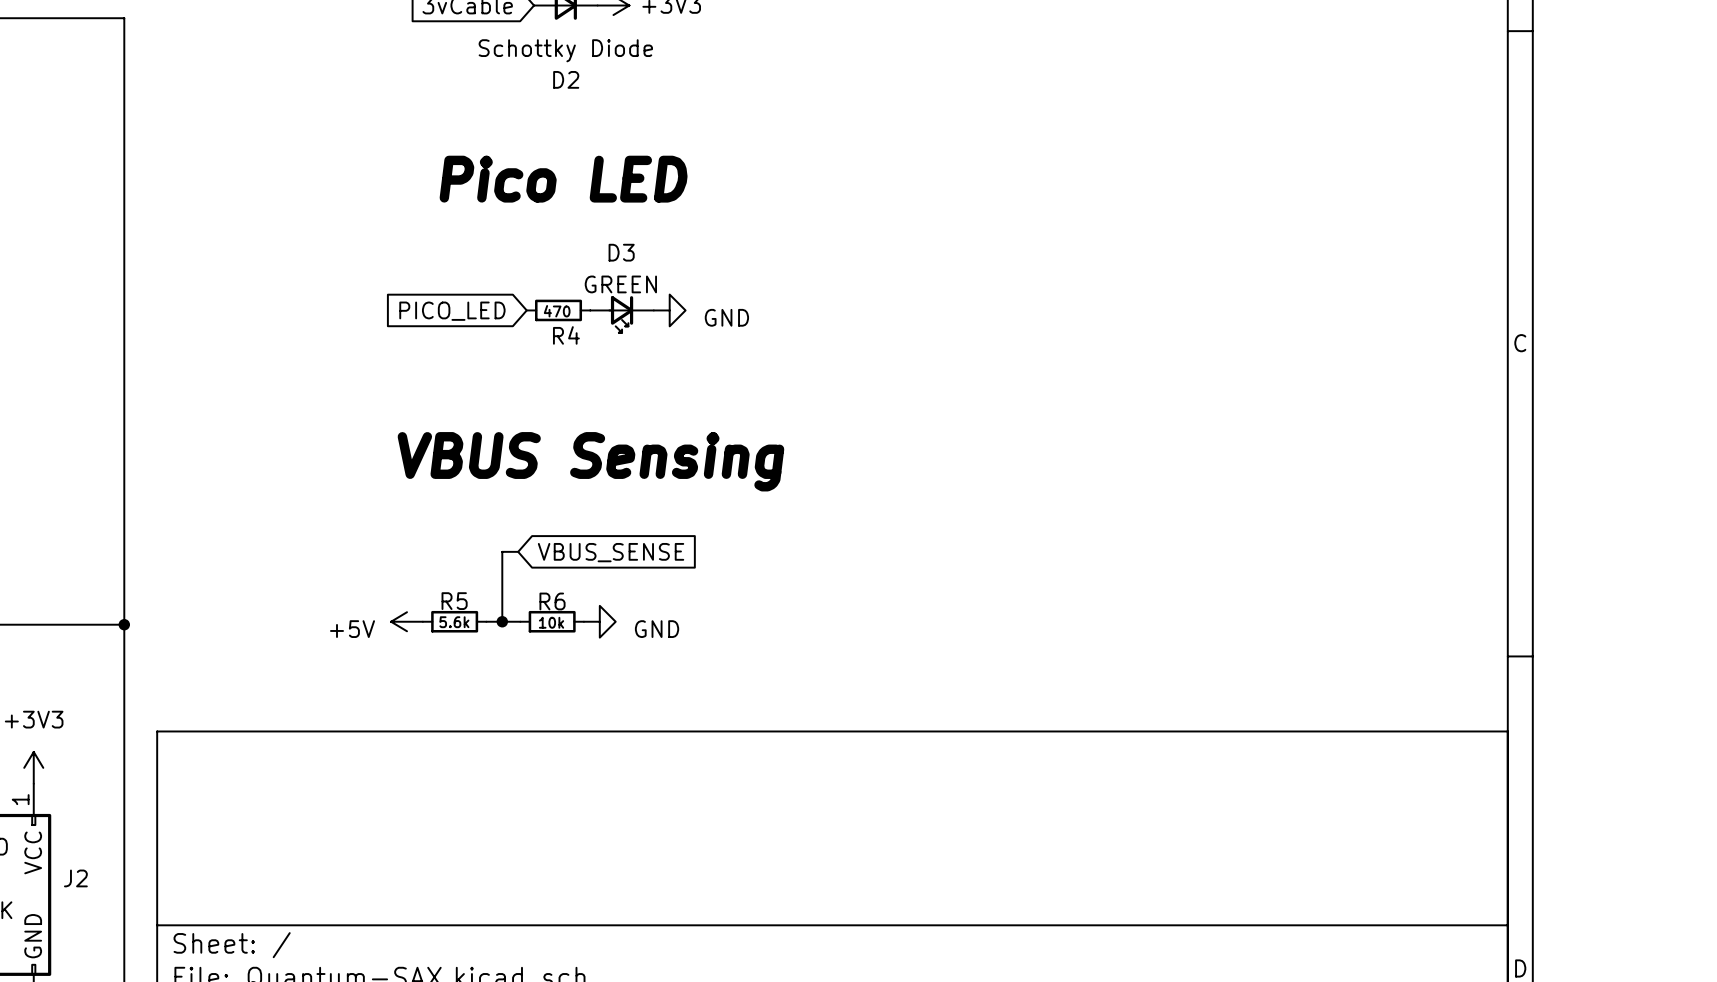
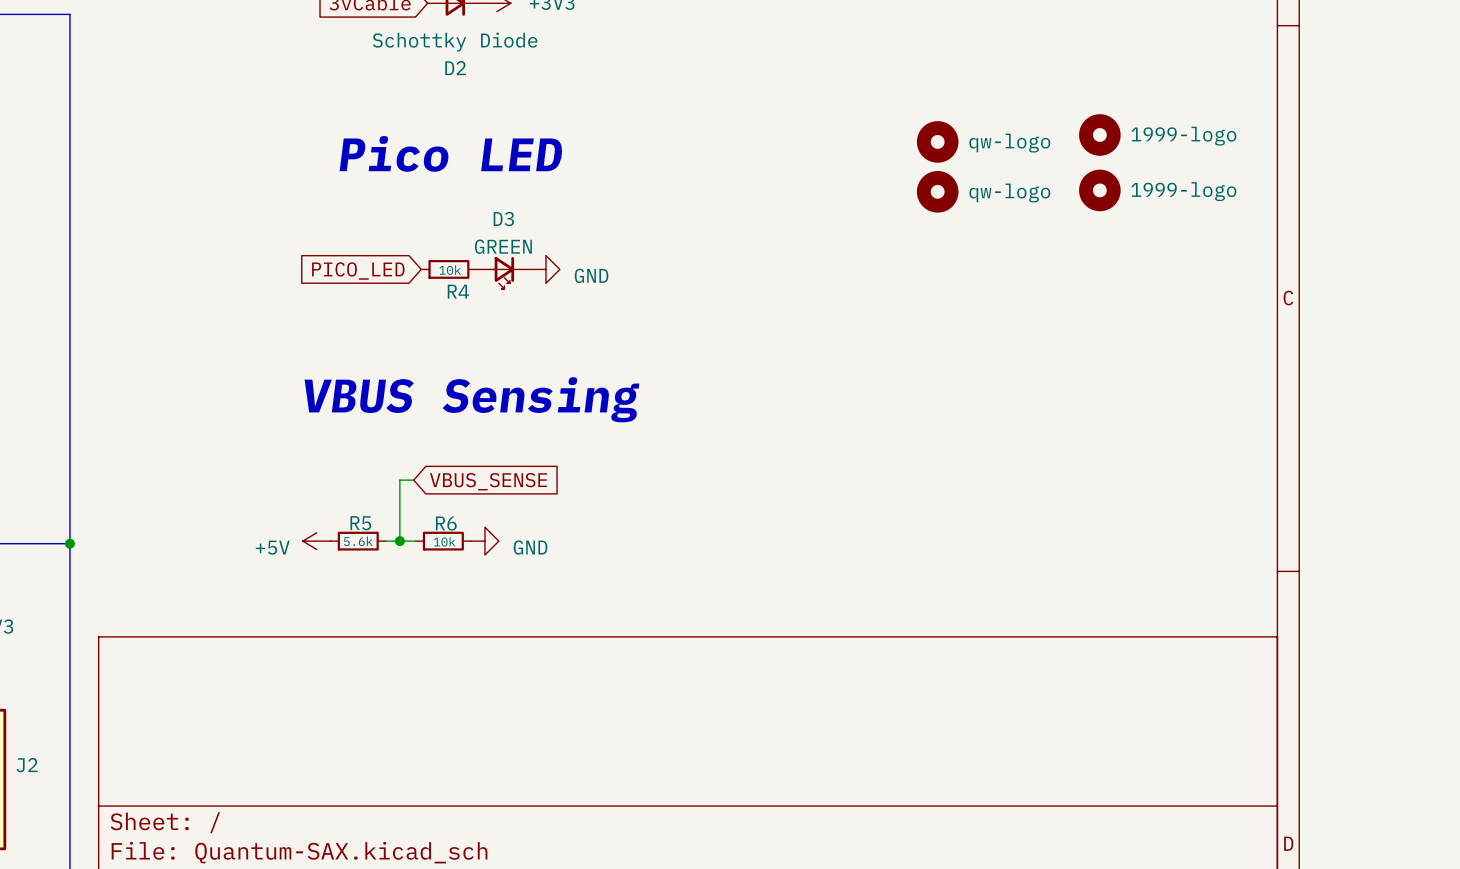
part: none -> 1999-logo (1099, 134)
part: none -> qw-logo (937, 141)
part: none -> 1999-logo (1099, 190)
part: none -> qw-logo (937, 191)
R4 value: 470 (557, 311) -> 10k (450, 270)

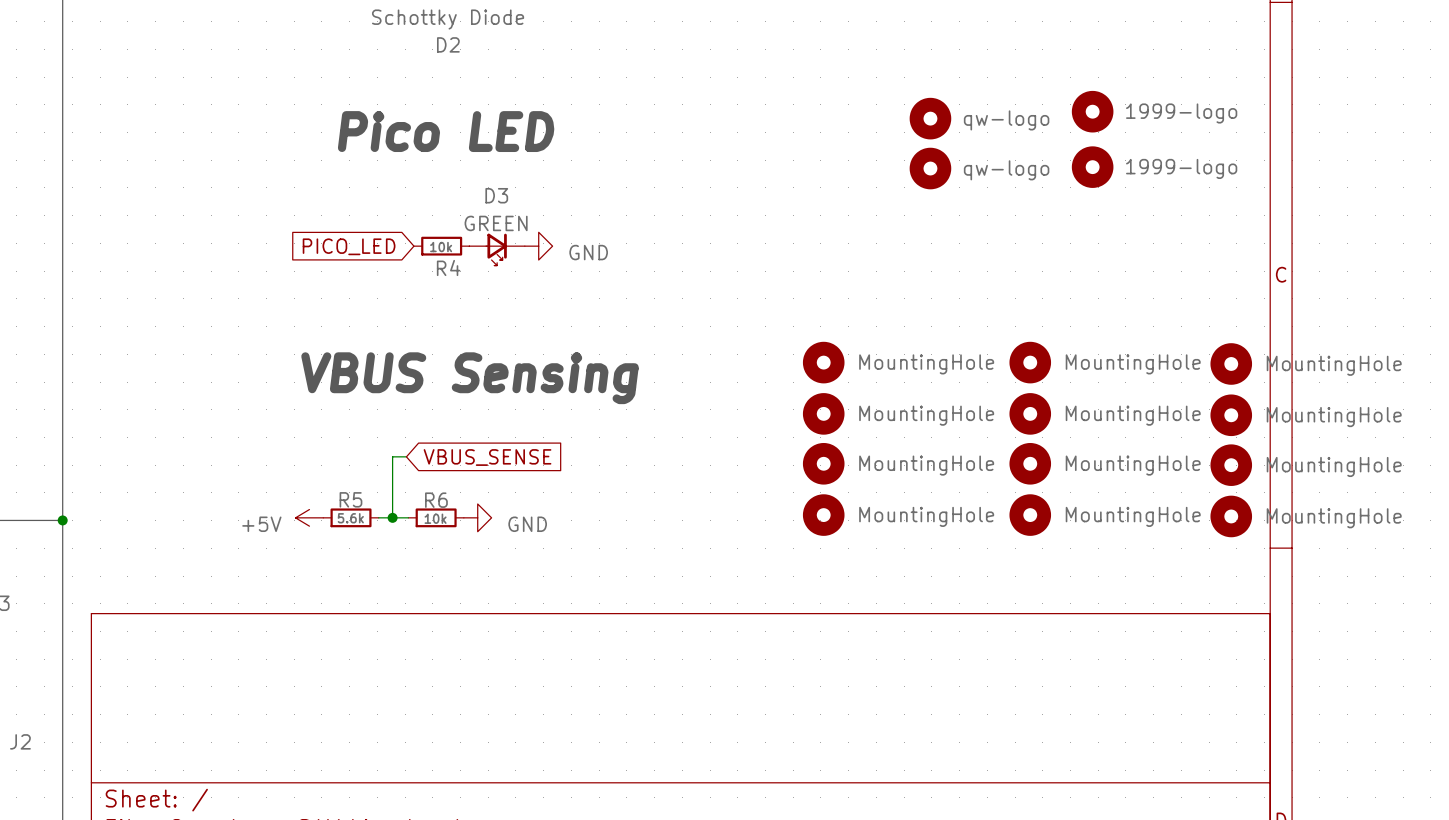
part: none -> MountingHole (823, 362)
part: none -> MountingHole (1030, 362)
part: none -> MountingHole (1231, 363)
part: none -> MountingHole (823, 413)
part: none -> MountingHole (1030, 413)
part: none -> MountingHole (1231, 415)
part: none -> MountingHole (823, 463)
part: none -> MountingHole (1030, 463)
part: none -> MountingHole (1231, 465)
part: none -> MountingHole (823, 515)
part: none -> MountingHole (1030, 515)
part: none -> MountingHole (1231, 516)

